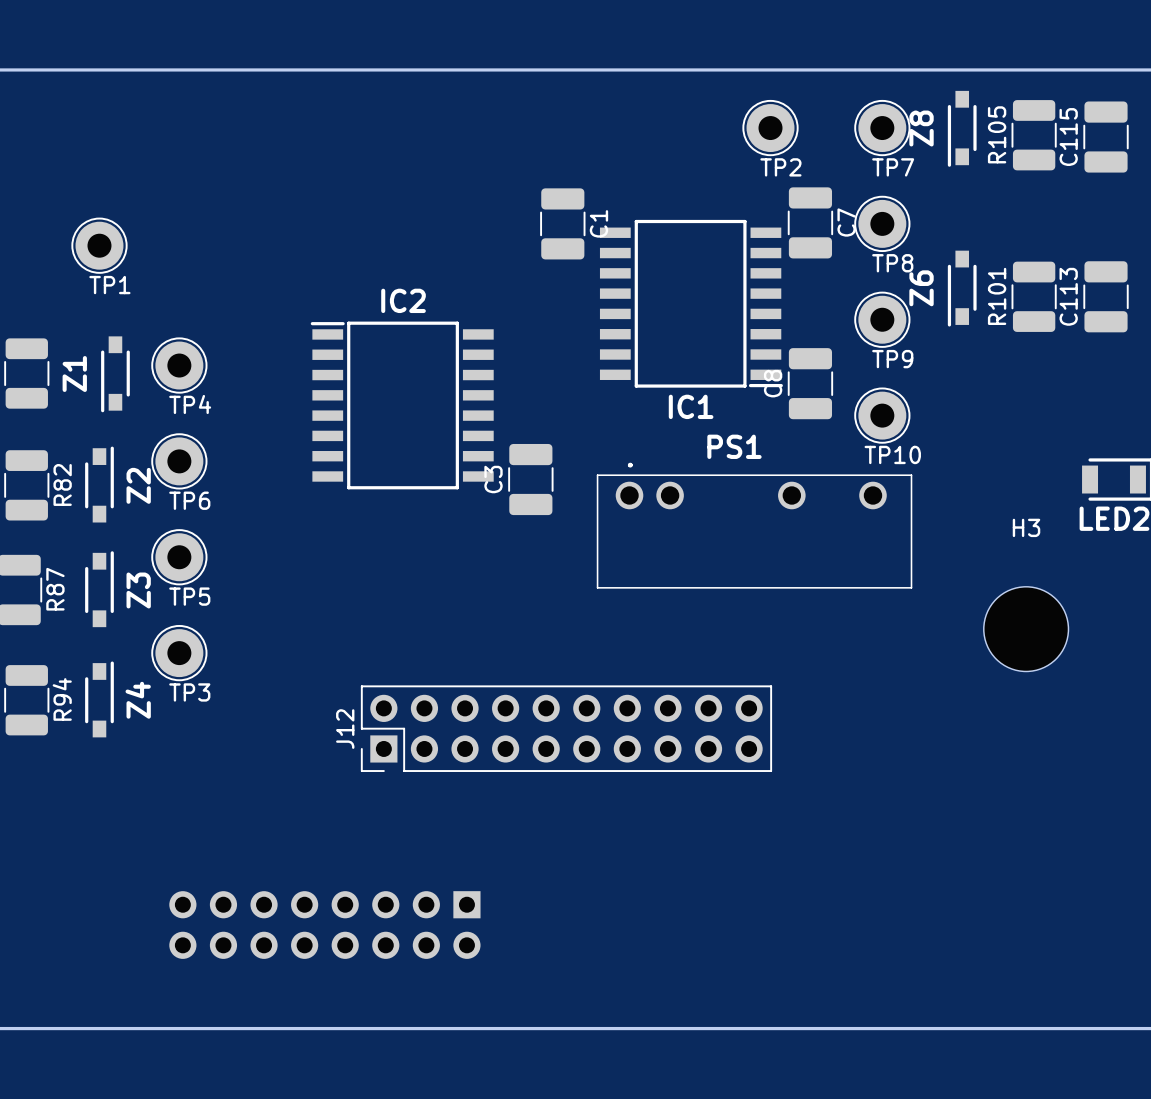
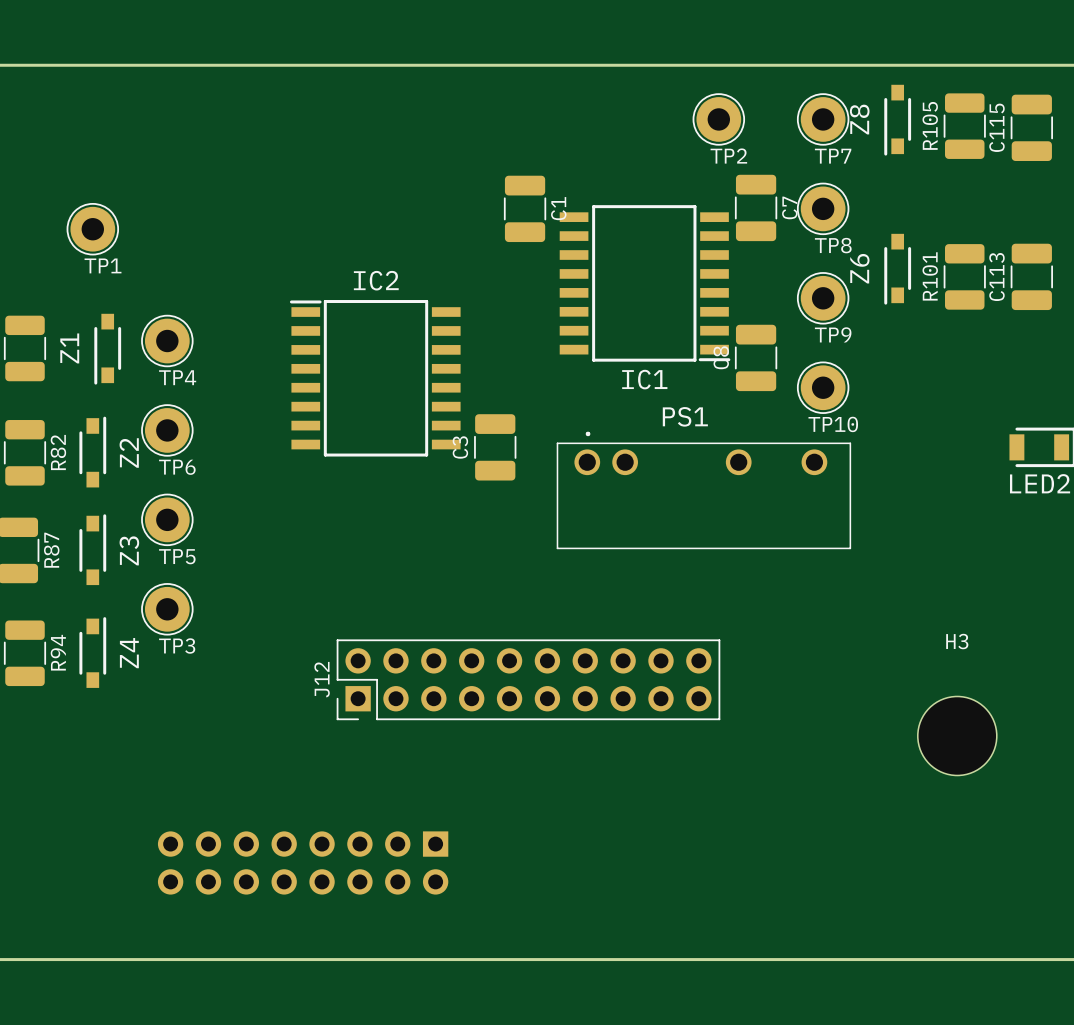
H3 position: (1026, 629) -> (957, 735)

